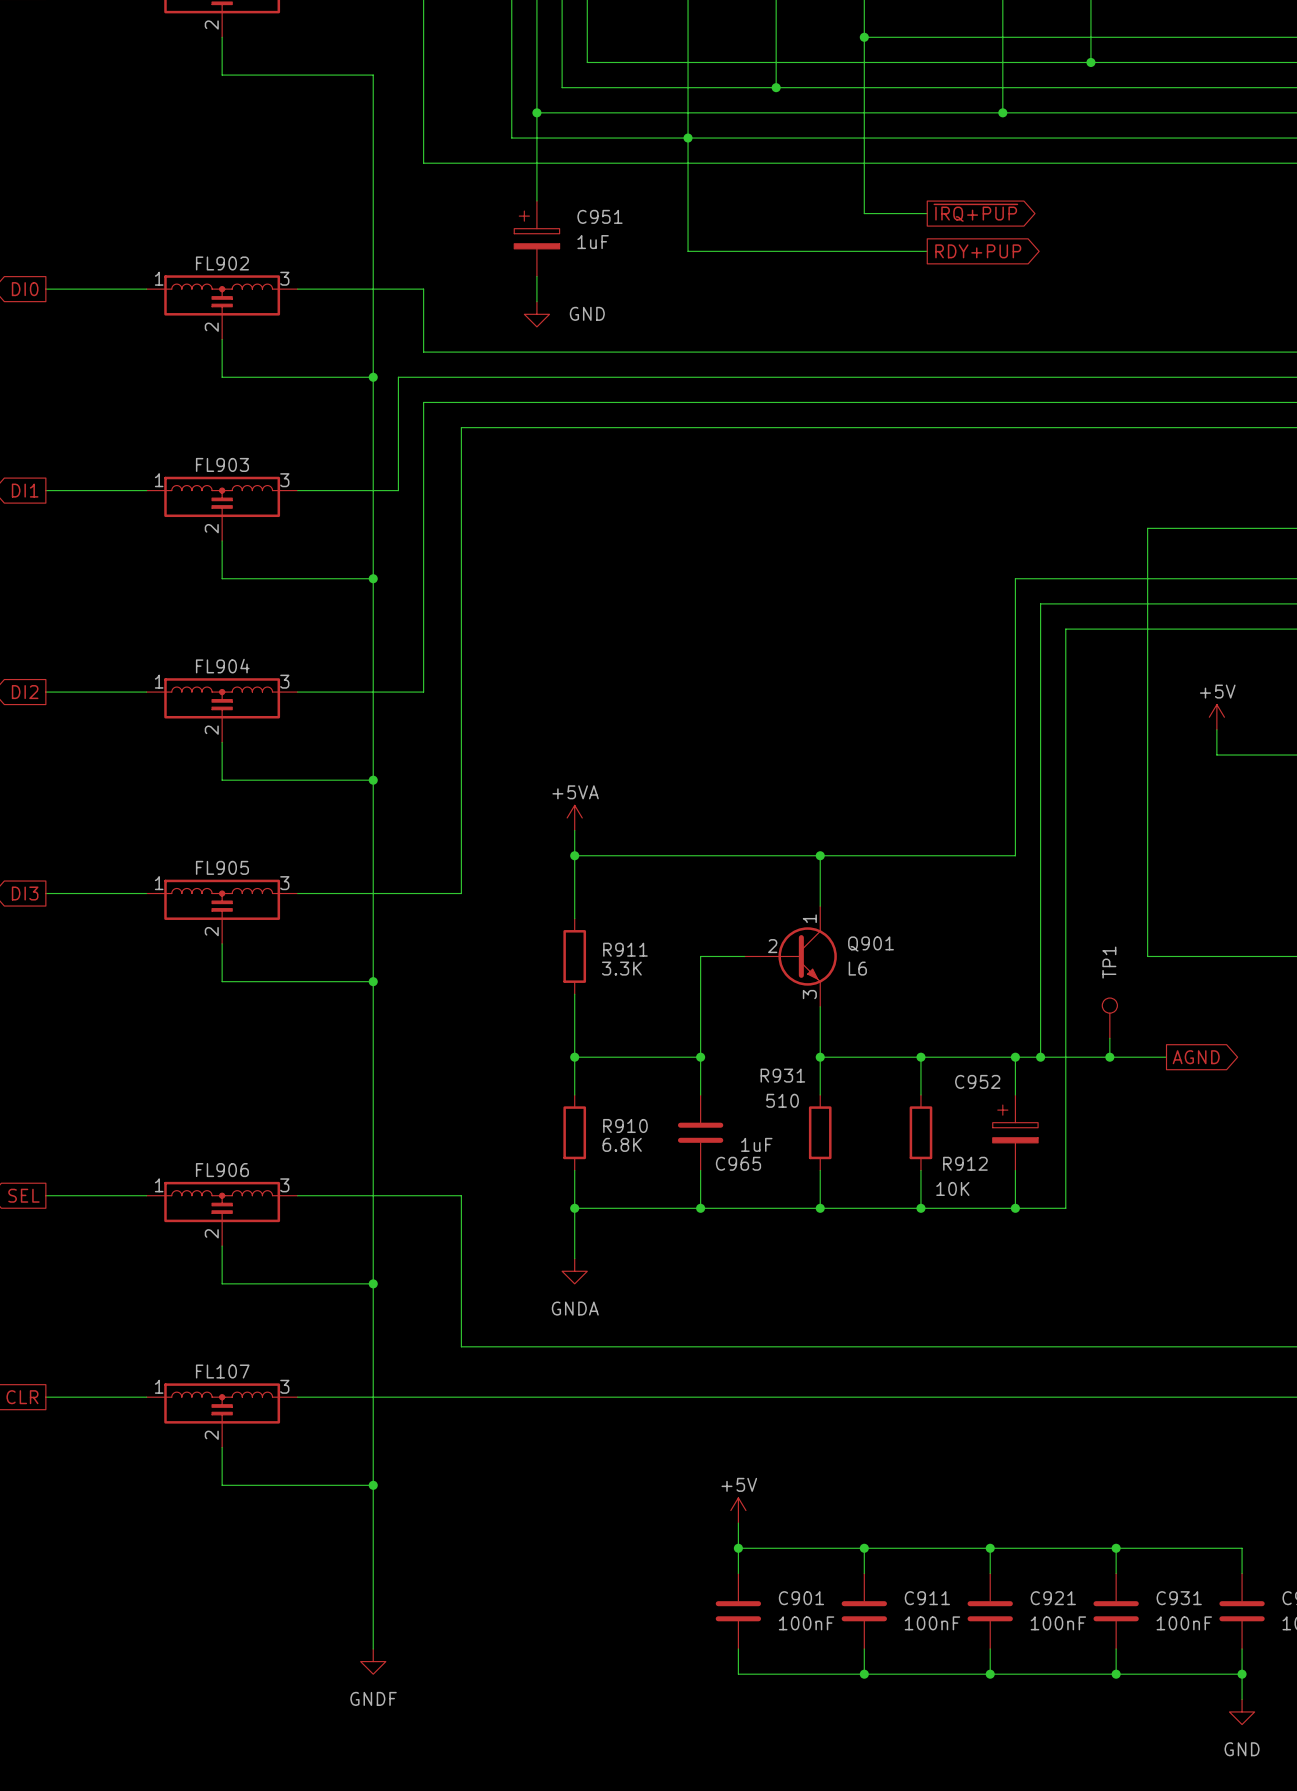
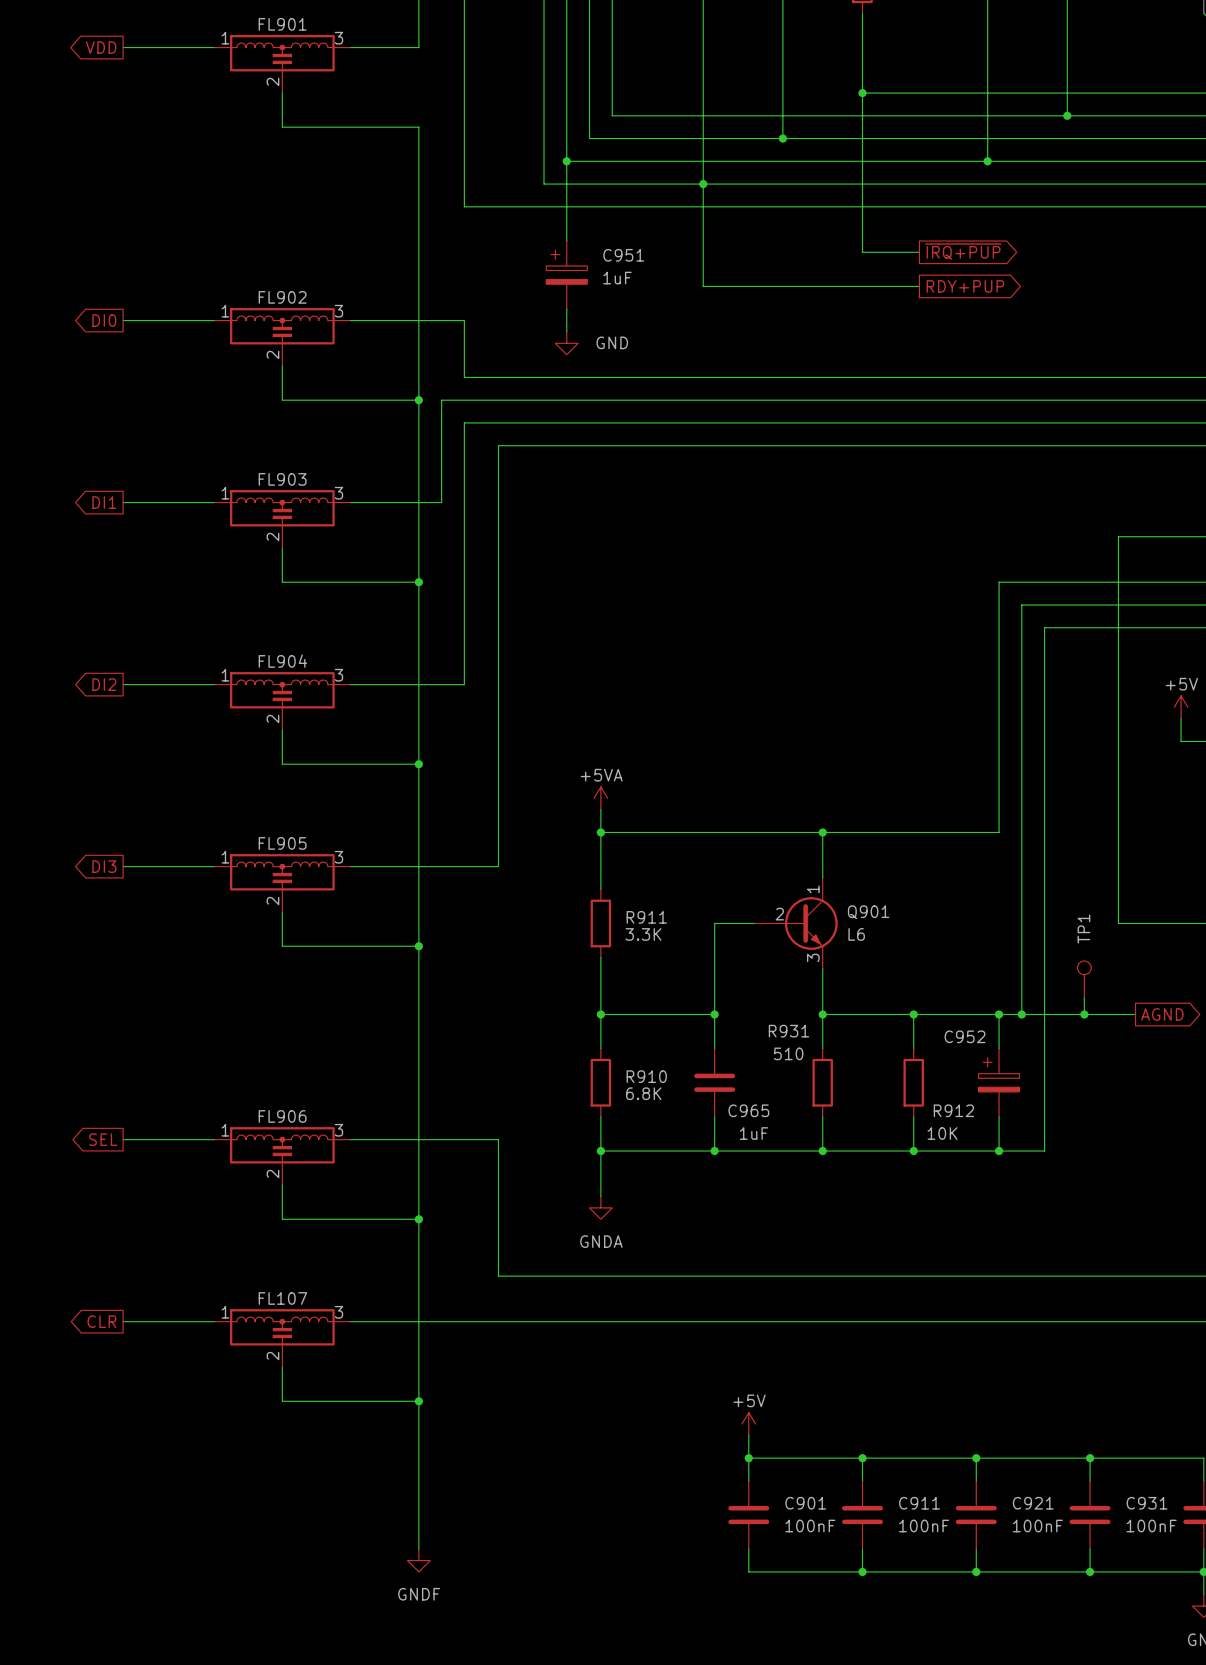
C965 value position: 1uF (756, 1144) -> 1uF (754, 1133)

